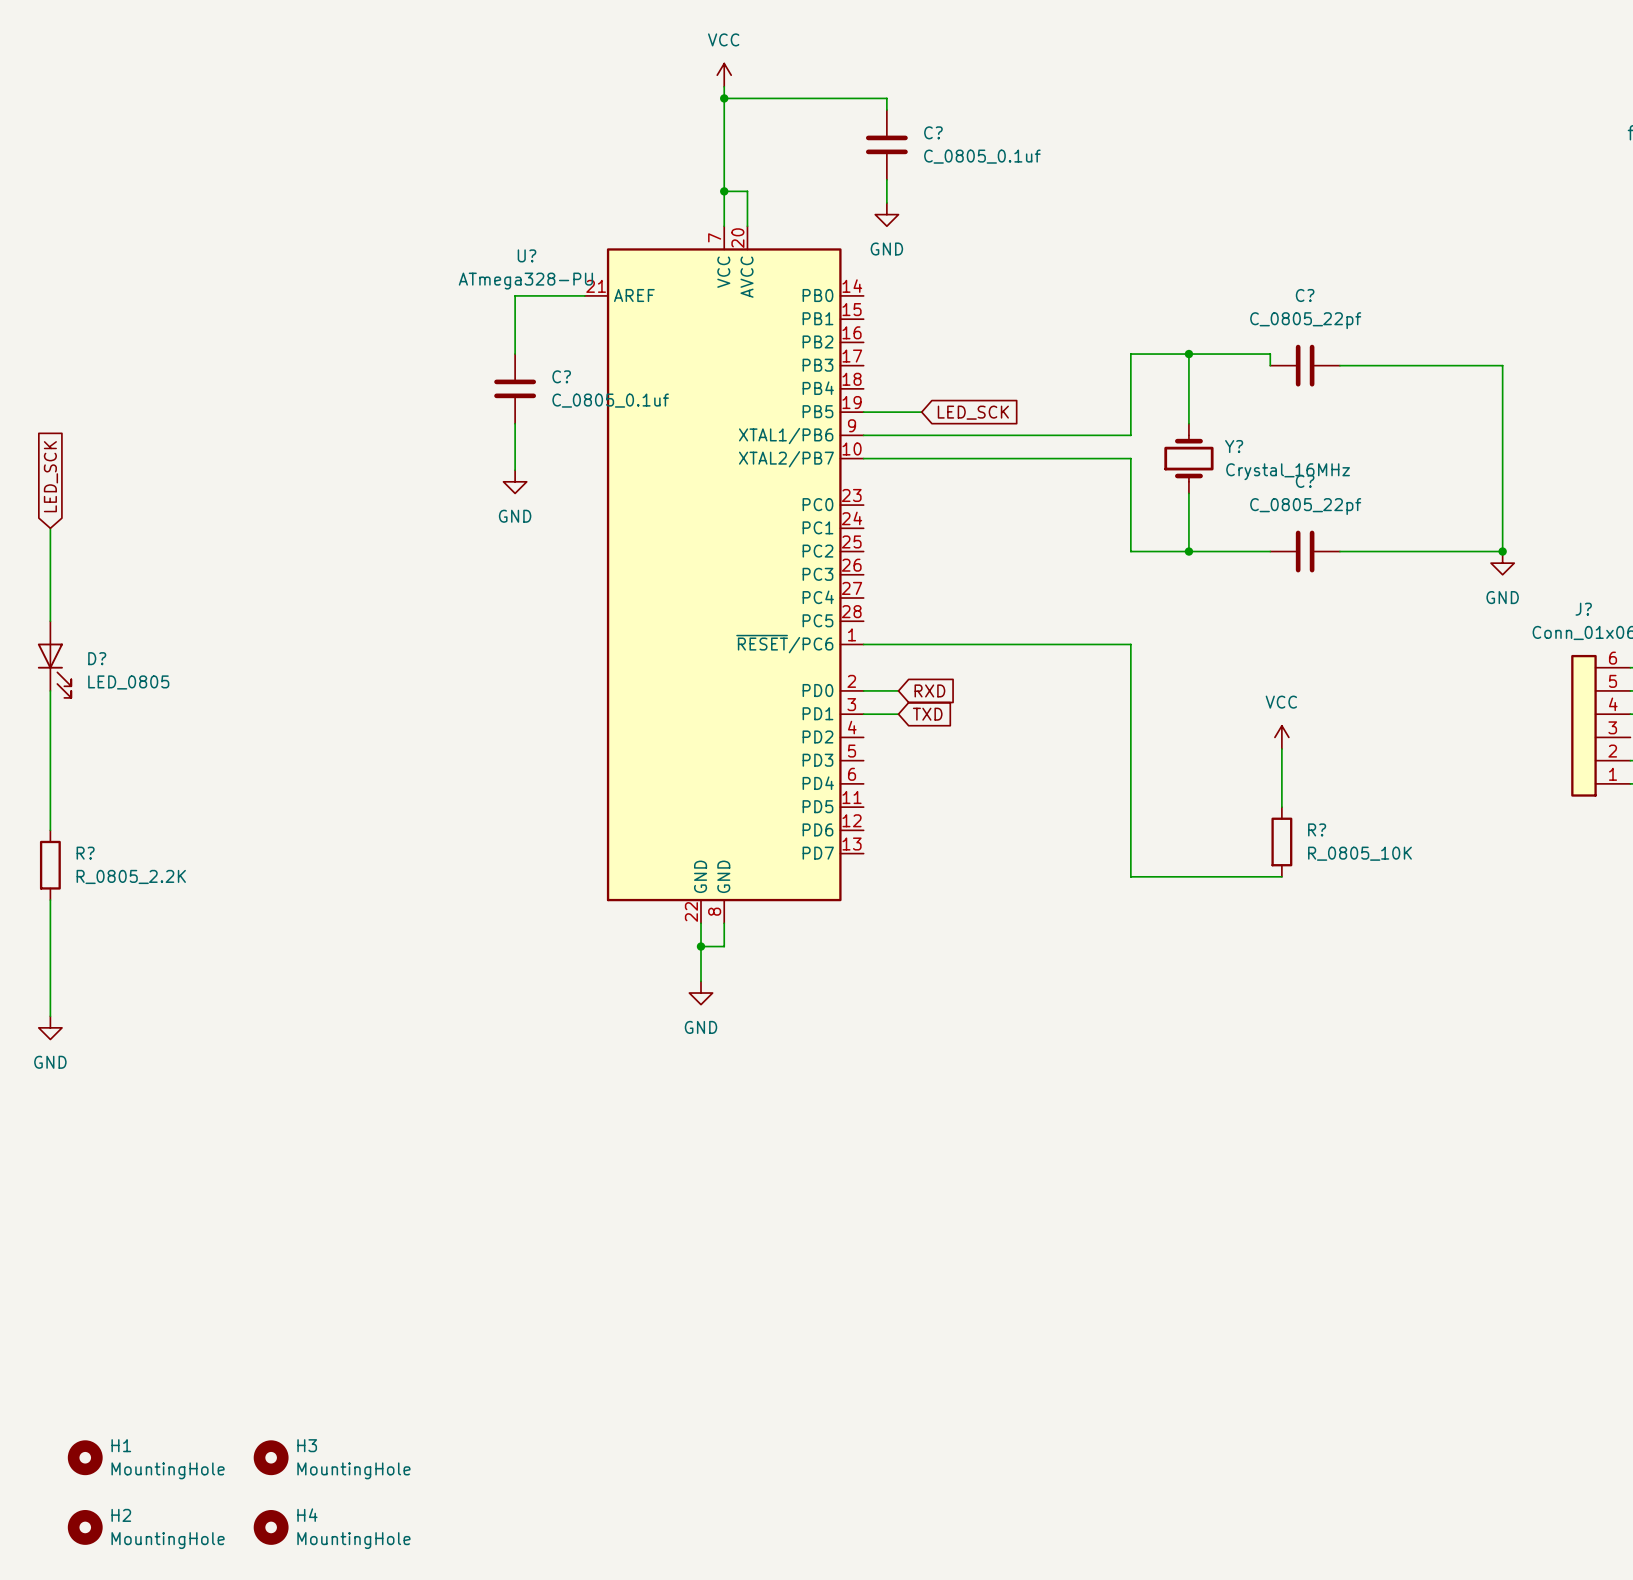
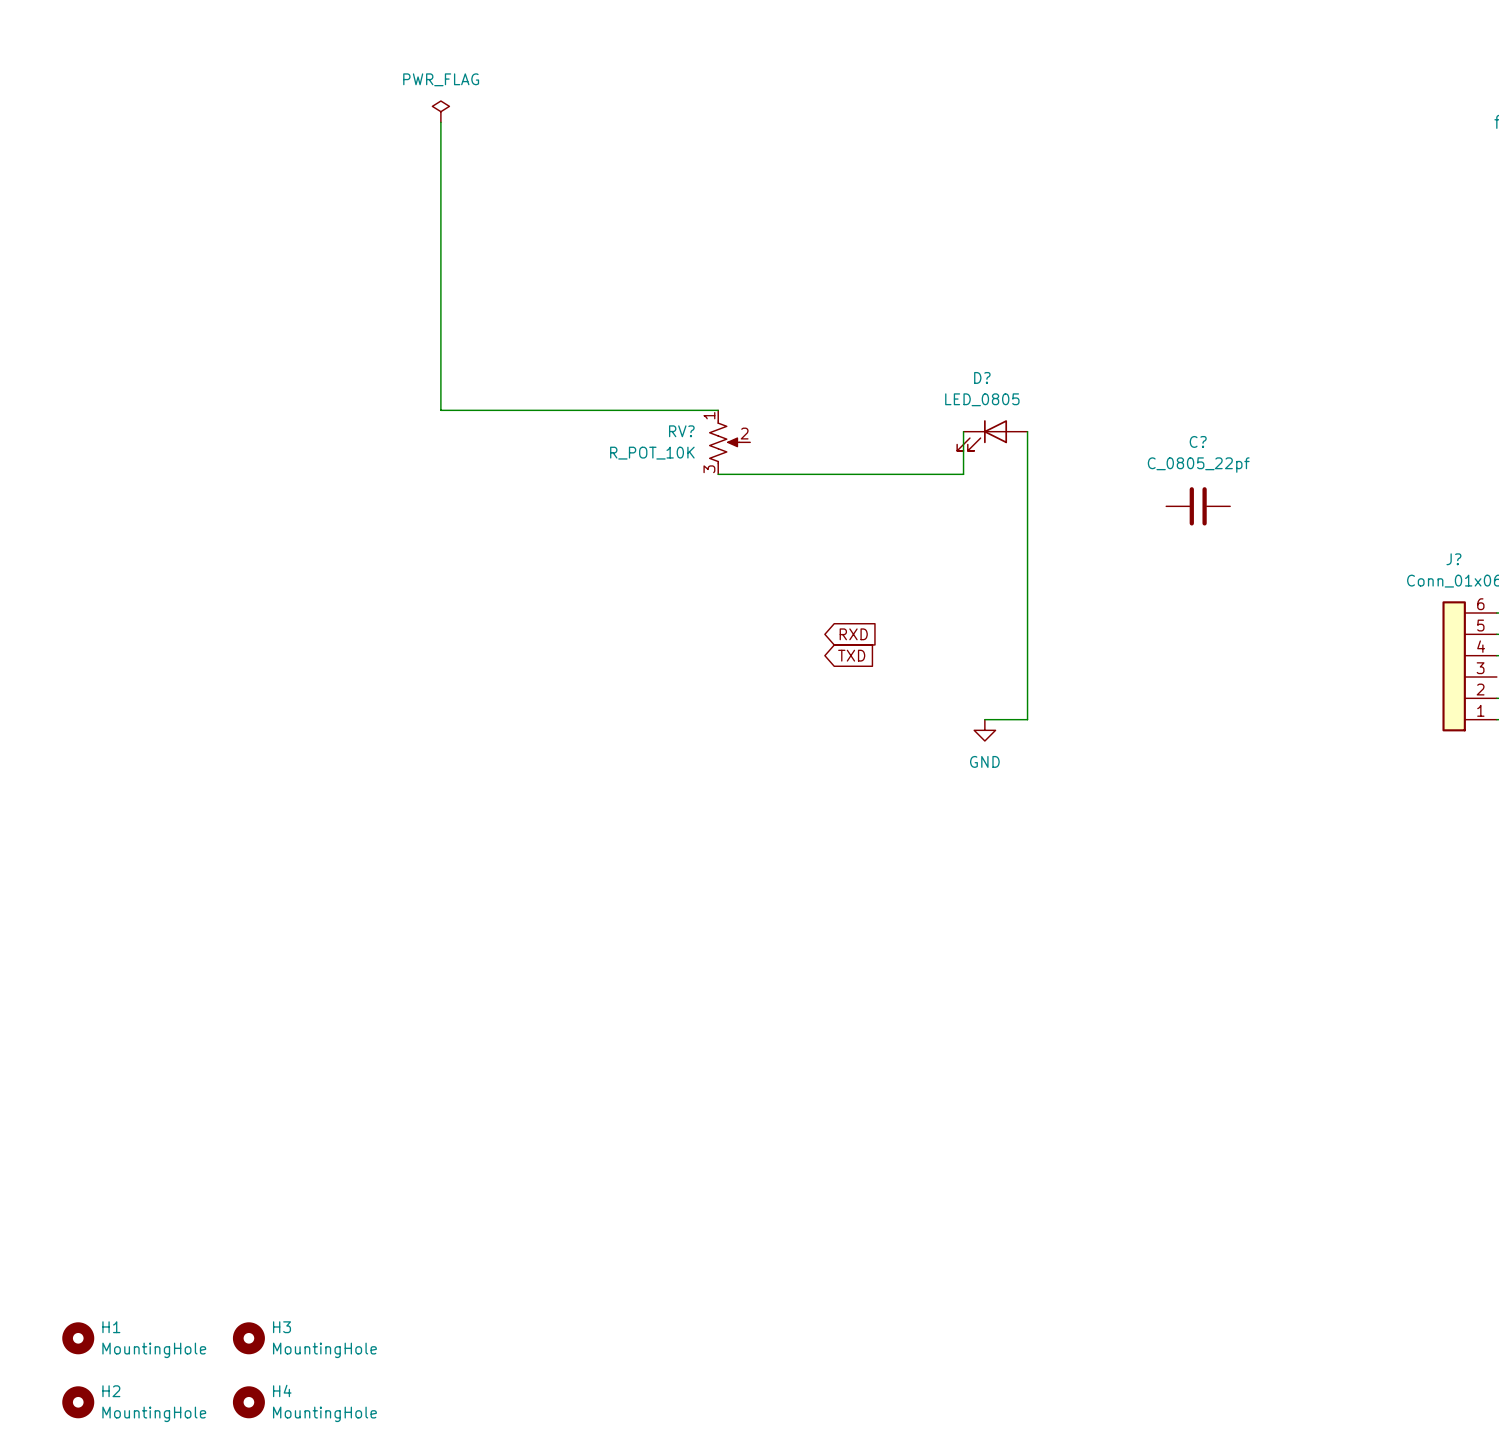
power symbol: VCC (724, 75) -> none
wire: (724, 86) (724, 226) -> none
wire: (724, 98) (886, 98) (886, 110) -> none
junction: (724, 98) -> none
power symbol: none -> PWR_FLAG (440, 111)
wire: none -> (440, 122) (440, 410) (718, 410)
C?: C_0805_0.1uf (886, 144) -> none
wire: (886, 179) (886, 202) -> none
wire: (724, 191) (747, 191) (747, 226) -> none
junction: (724, 191) -> none
power symbol: GND (886, 214) -> none
wire: (584, 295) (515, 295) (515, 354) -> none
wire: (1188, 354) (1188, 423) -> none
junction: (1188, 354) -> none
wire: (1270, 365) (1270, 354) (1130, 354) (1130, 435) (863, 435) -> none
C?: C_0805_22pf (1305, 365) -> none
wire: (1339, 365) (1502, 365) (1502, 551) (1339, 551) -> none
C?: C_0805_0.1uf (515, 388) -> none
wire: (863, 412) (921, 412) -> none
global label: LED_SCK (973, 412) -> none
wire: (515, 423) (515, 470) -> none
wire: (863, 458) (1130, 458) (1130, 551) (1270, 551) -> none
Y?: Crystal_16MHz (1188, 458) -> none
wire: none -> (963, 431) (963, 474) (718, 474)
wire: none -> (1027, 431) (1027, 719) (984, 719)
D?: none -> LED_0805 (992, 435)
global label: LED_SCK (50, 476) -> none
power symbol: GND (515, 481) -> none
RV?: none -> R_POT_10K (729, 442)
wire: (1188, 493) (1188, 551) -> none
wire: (50, 528) (50, 621) -> none
junction: (1188, 551) -> none
junction: (1502, 551) -> none
power symbol: GND (1502, 563) -> none
U?: ATmega328-PU (724, 574) -> none
wire: (863, 644) (1130, 644) (1130, 876) (1281, 876) -> none
D?: LED_0805 (54, 659) -> none
wire: (50, 690) (50, 830) -> none
wire: (863, 690) (898, 690) -> none
wire: (863, 714) (898, 714) -> none
power symbol: VCC (1281, 737) -> none
wire: (1281, 749) (1281, 807) -> none
power symbol: none -> GND (984, 730)
R?: R_0805_10K (1281, 841) -> none
R?: R_0805_2.2K (50, 865) -> none
wire: (50, 900) (50, 1016) -> none
wire: (700, 923) (700, 981) -> none
wire: (724, 923) (724, 946) (700, 946) -> none
junction: (700, 946) -> none
power symbol: GND (700, 993) -> none
power symbol: GND (50, 1027) -> none

